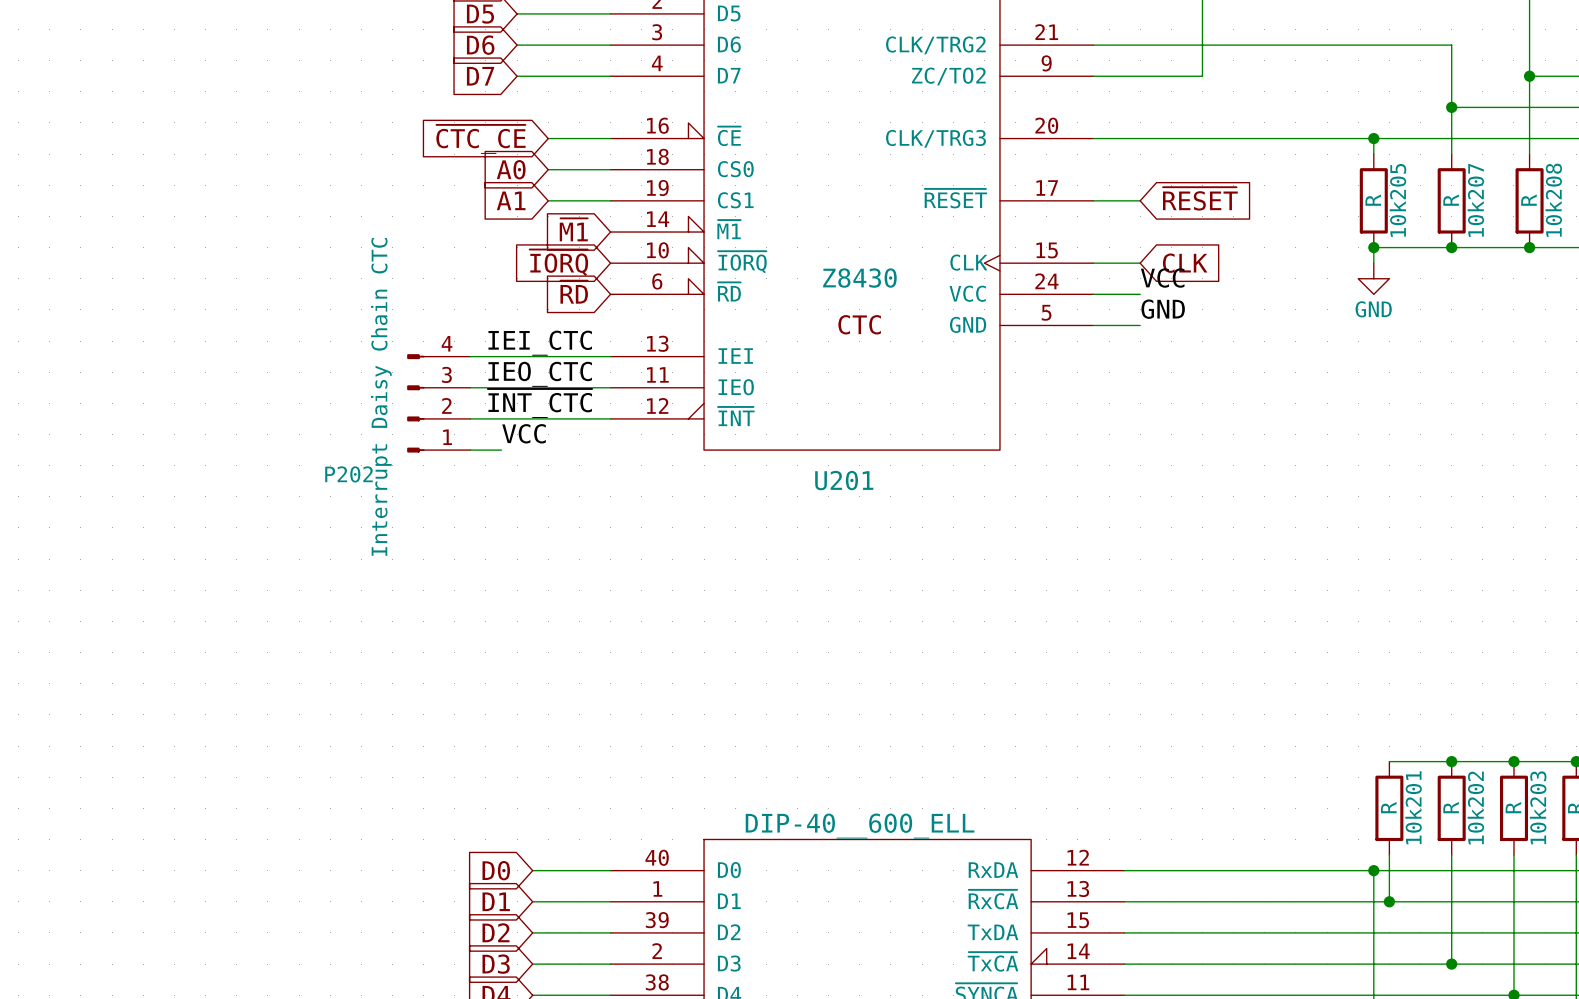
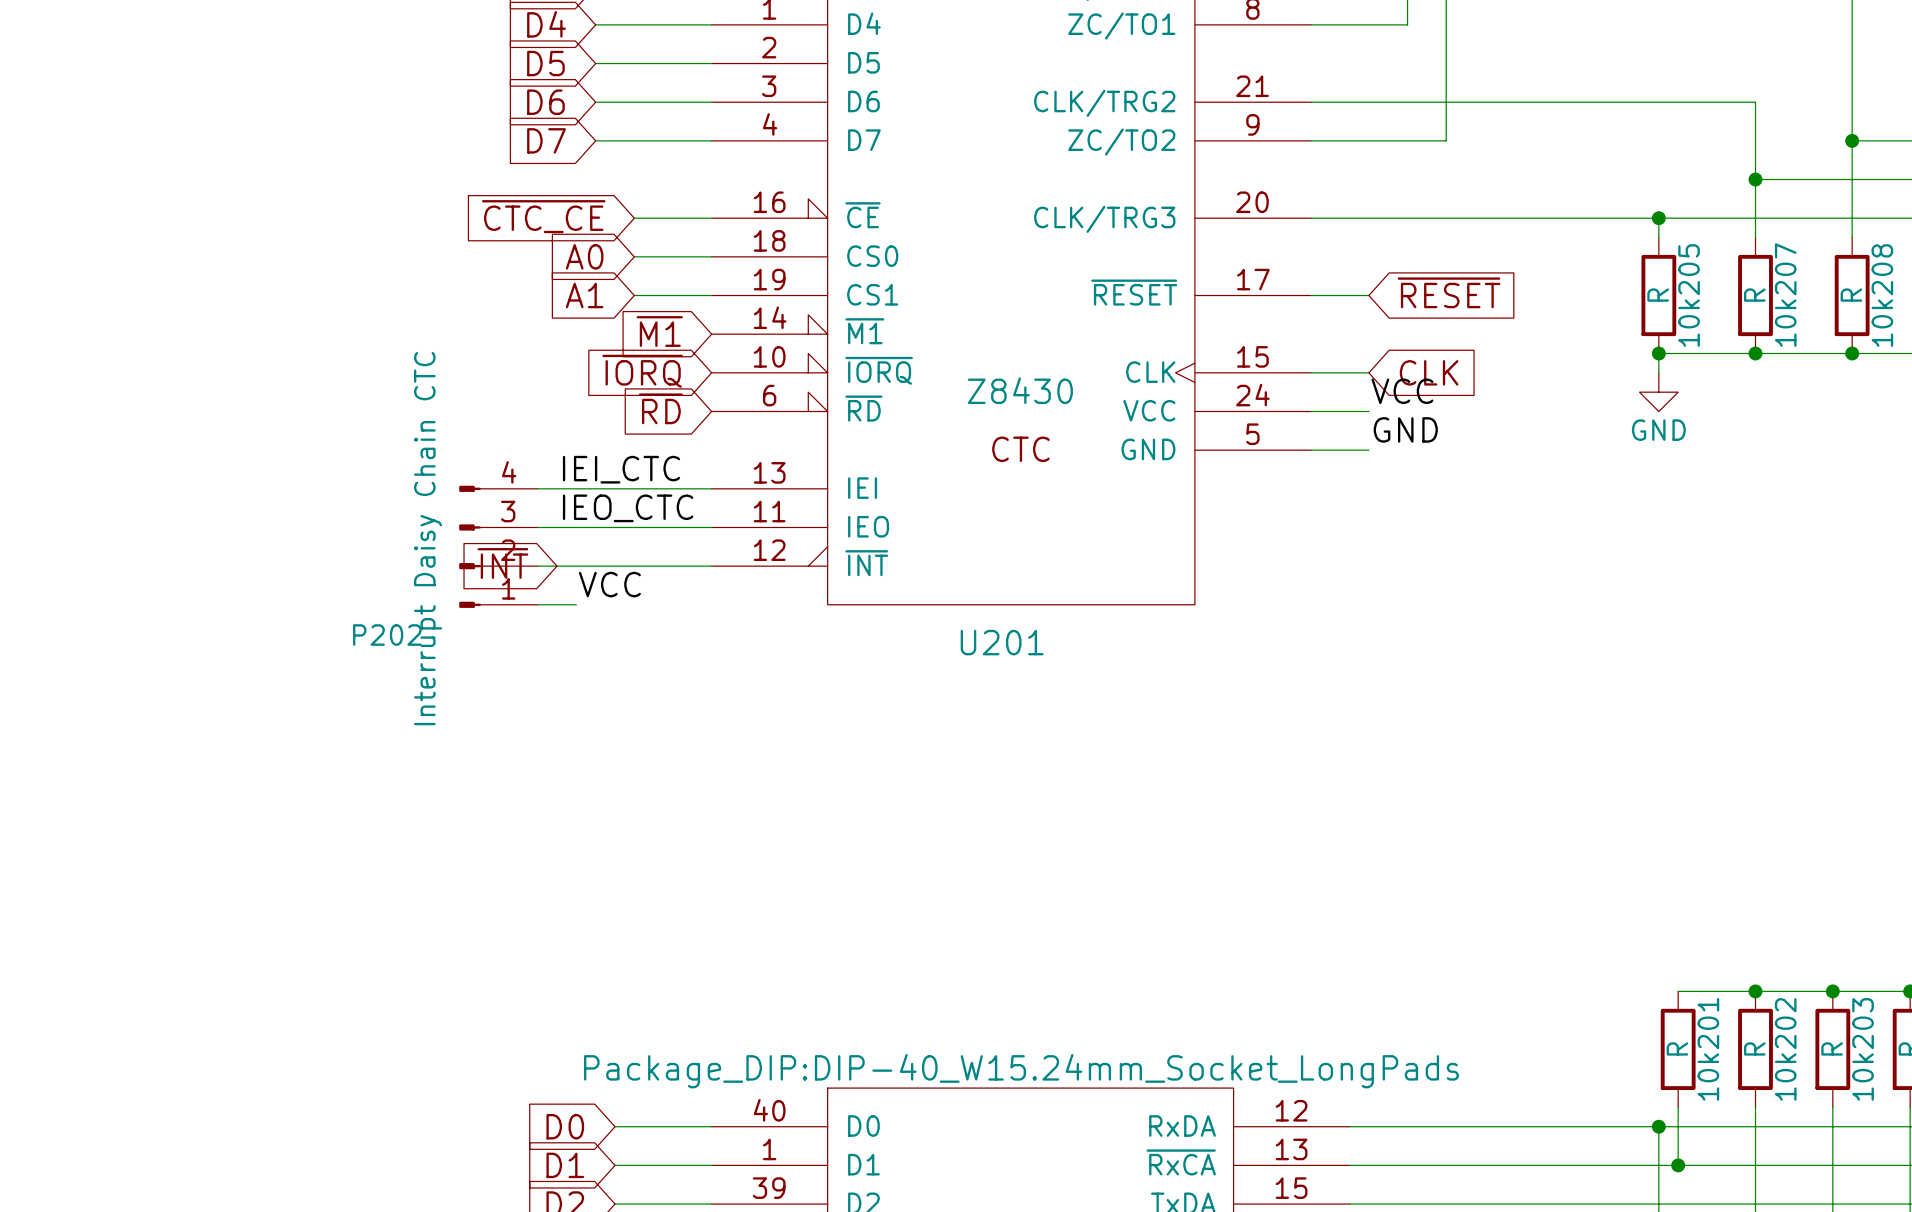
label: ~{INT_CTC} (539, 403) -> none
global label: none -> ~{INT} (502, 563)
part text: DIP-40__600_ELL (860, 826) -> Package_DIP:DIP-40_W15.24mm_Socket_LongPads (1021, 1071)

